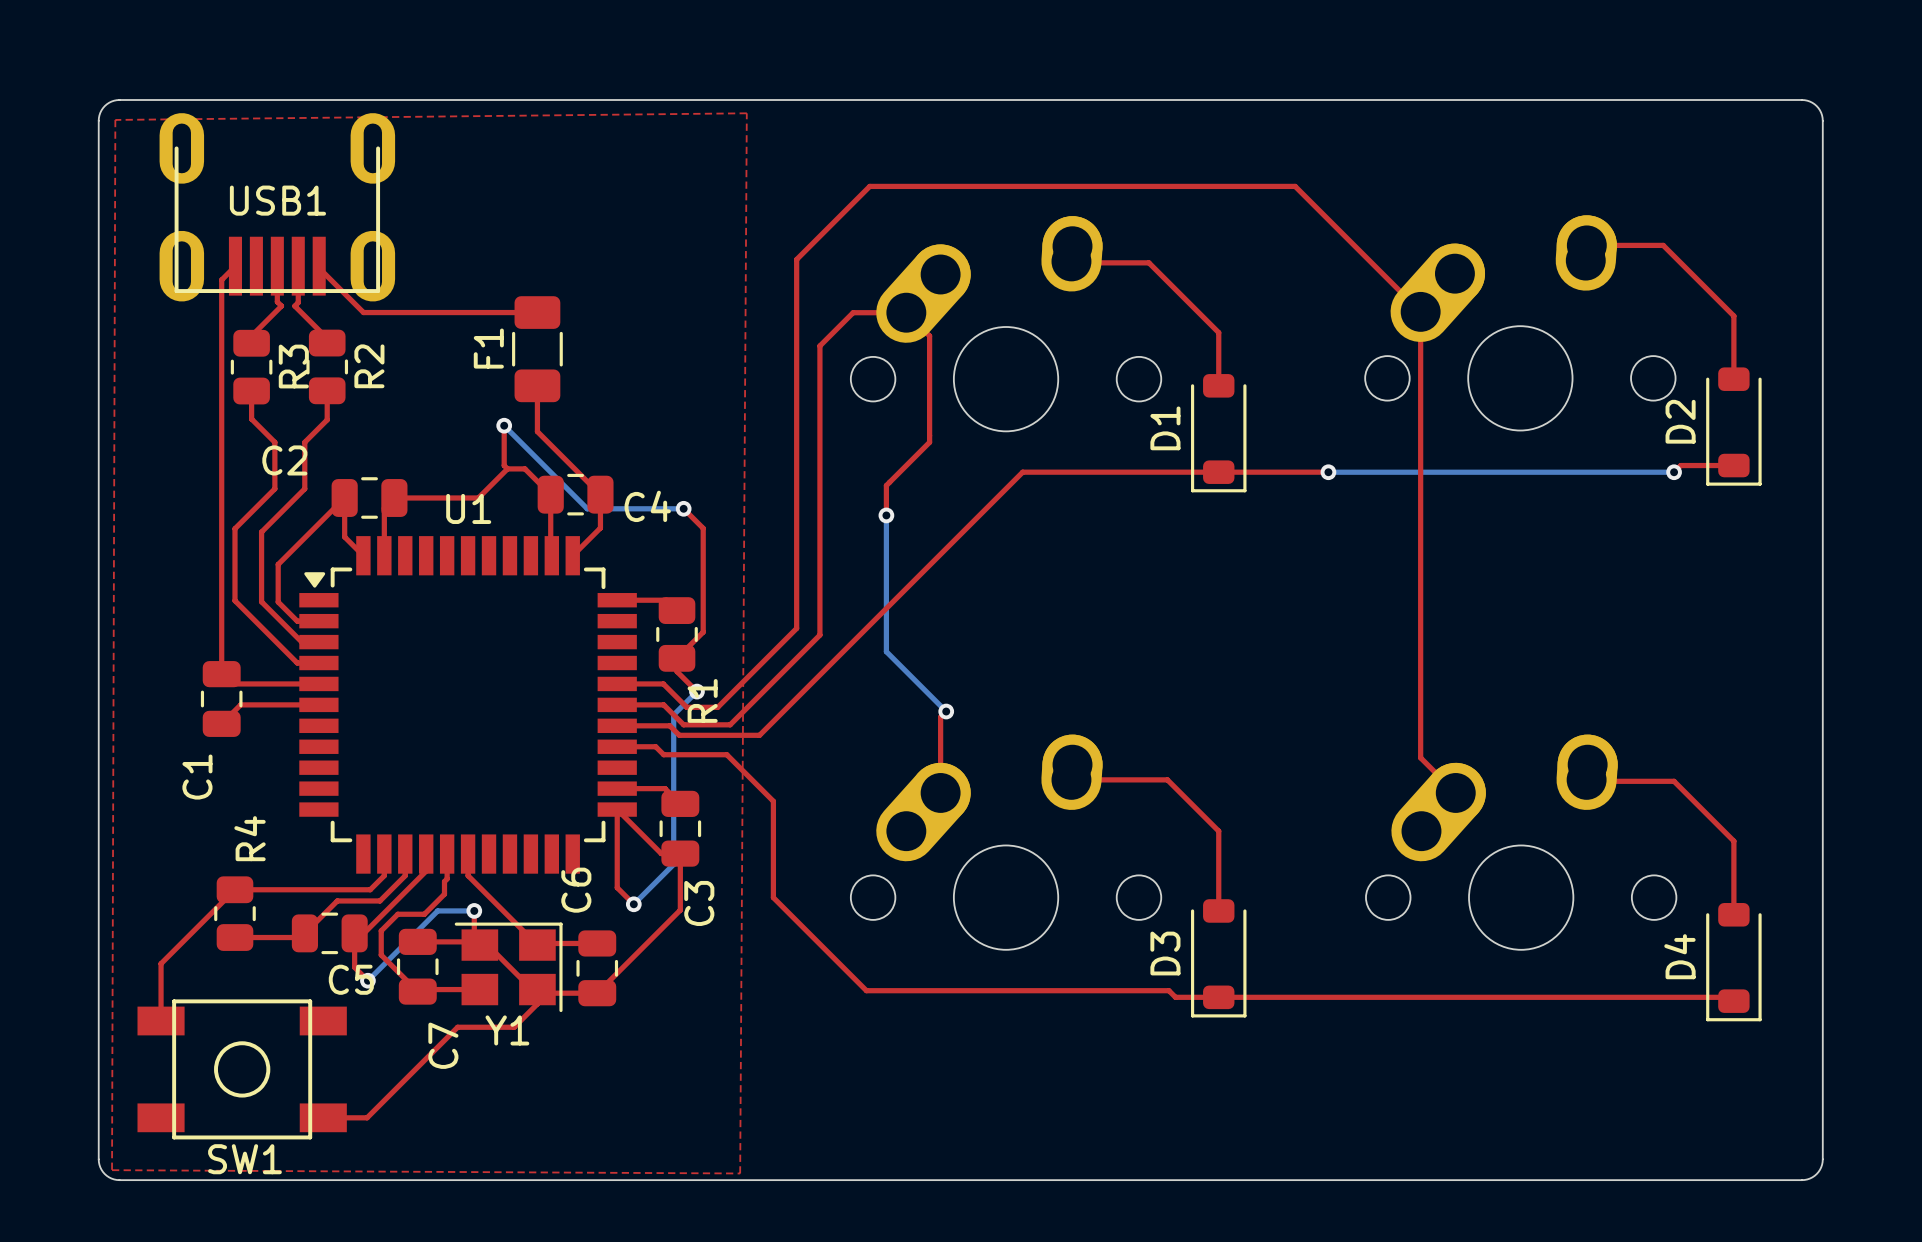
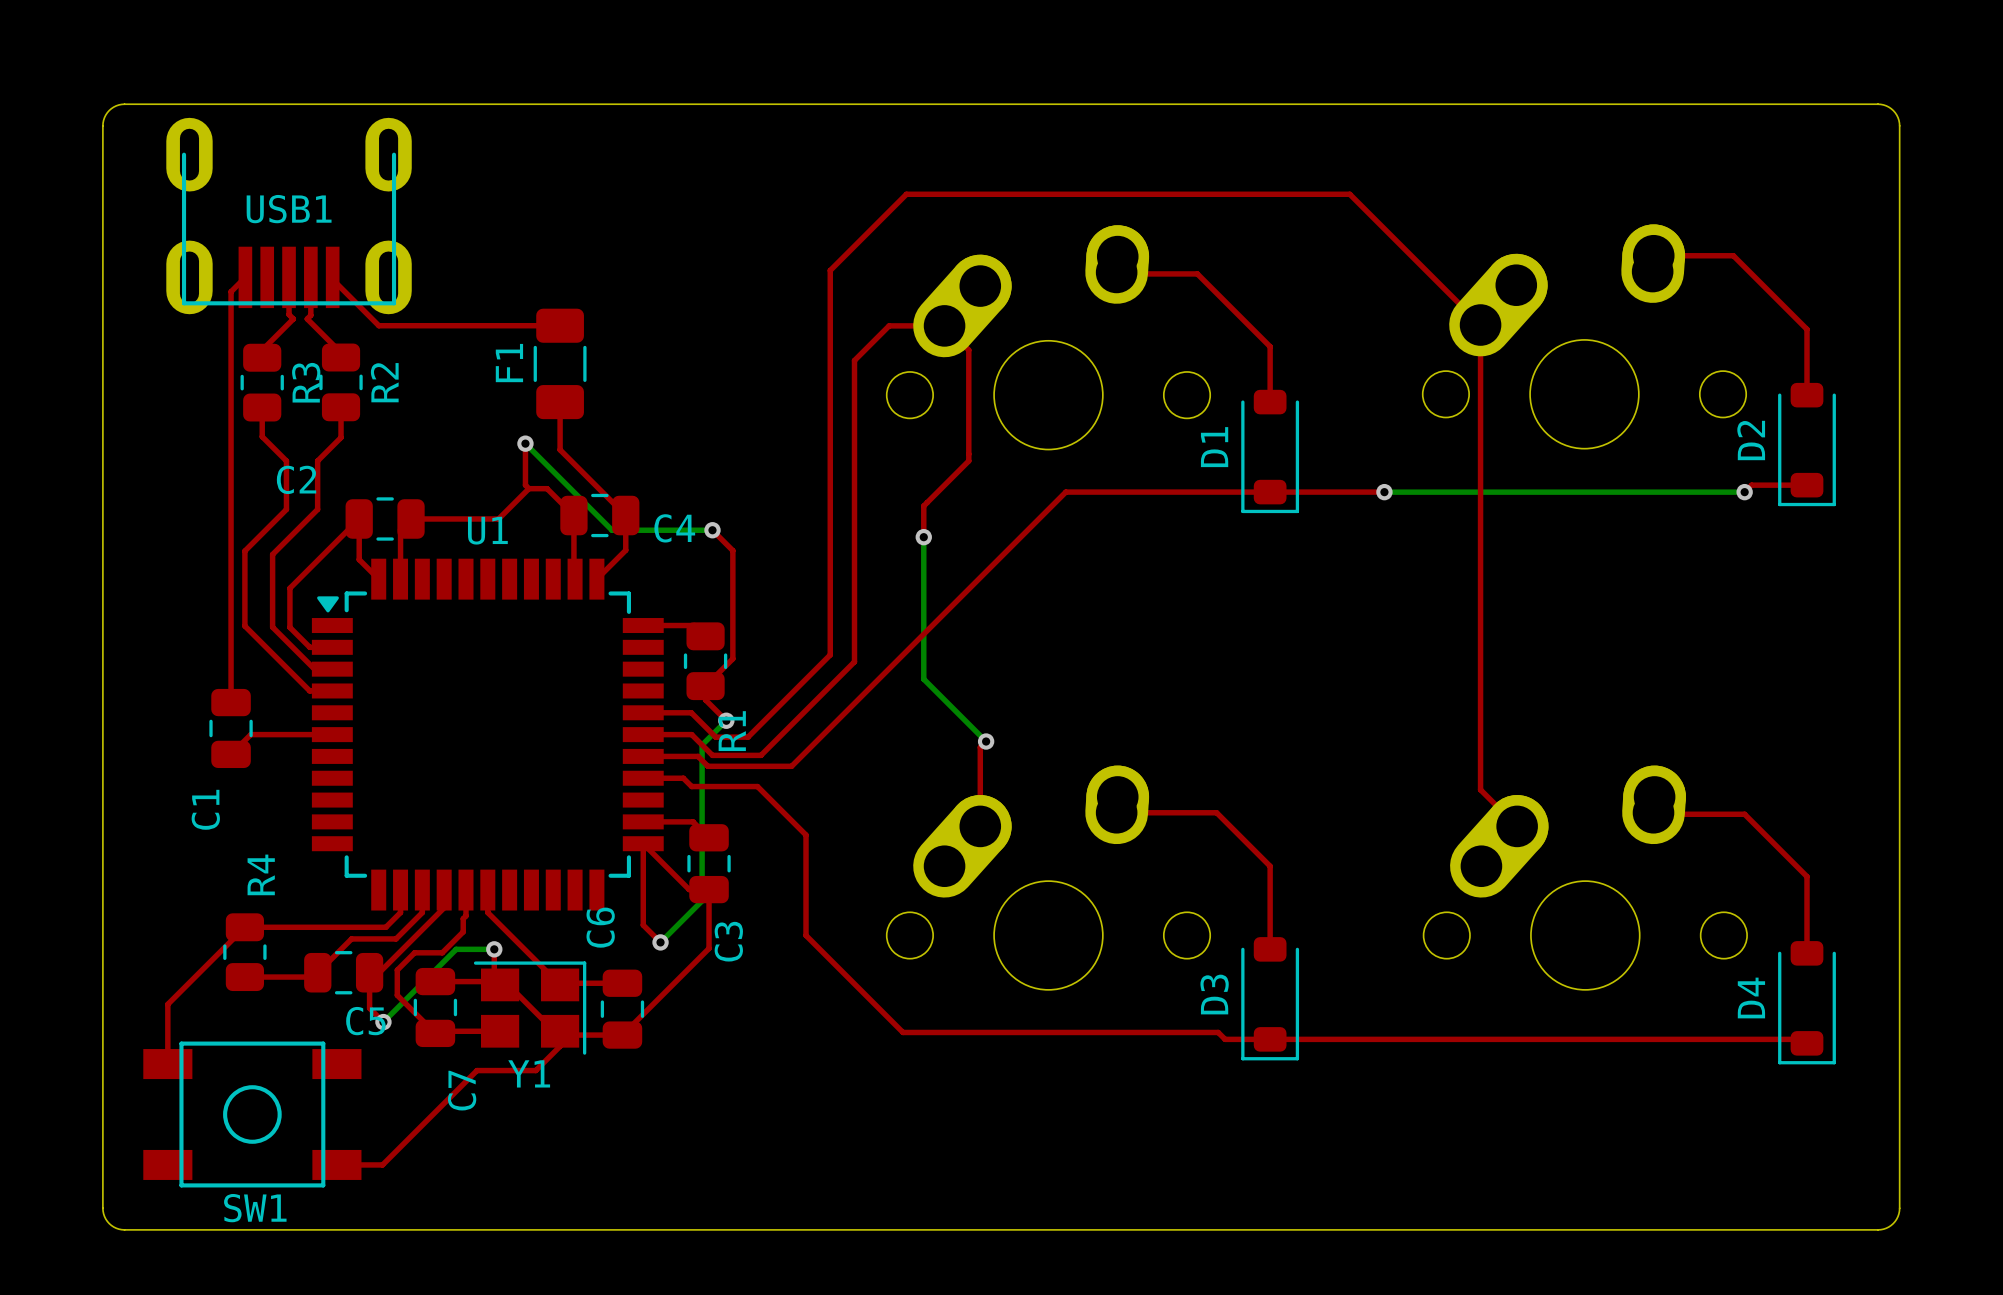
top zone outline: (746, 113) (740, 1173) (112, 1170) (115, 119) (746, 113) -> none
top track: (221, 674) (231, 683) (318, 683) -> none

